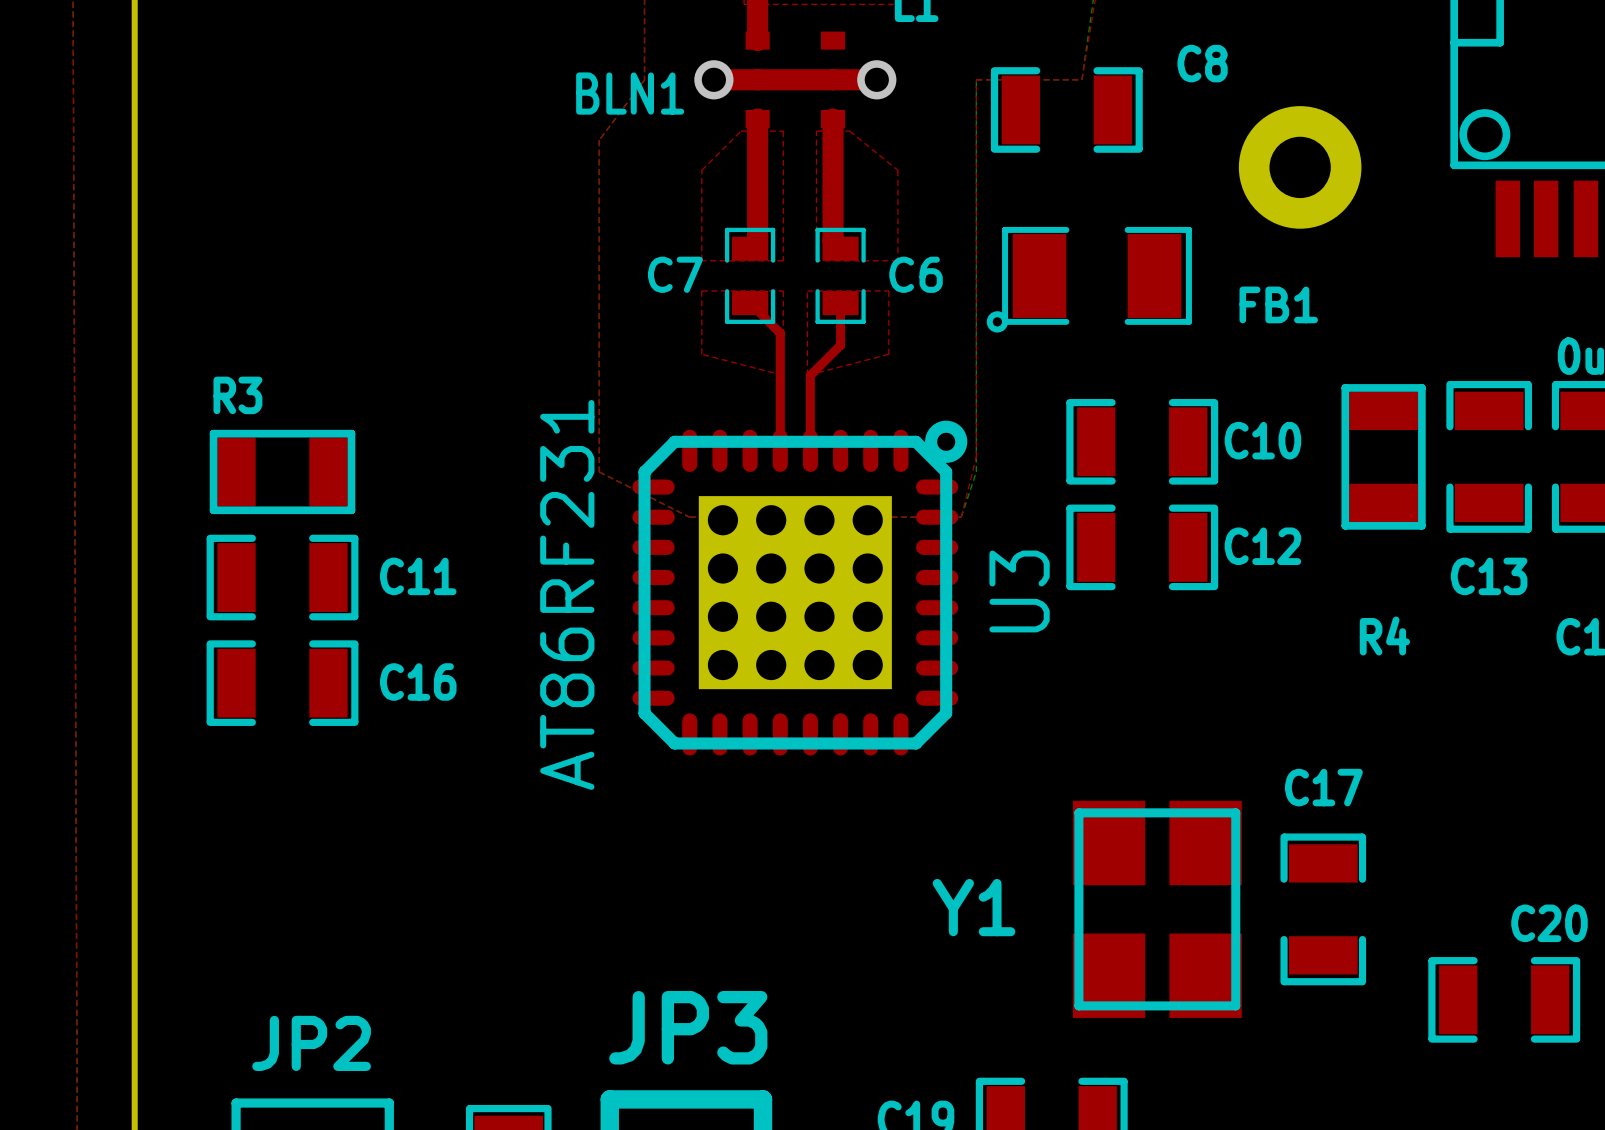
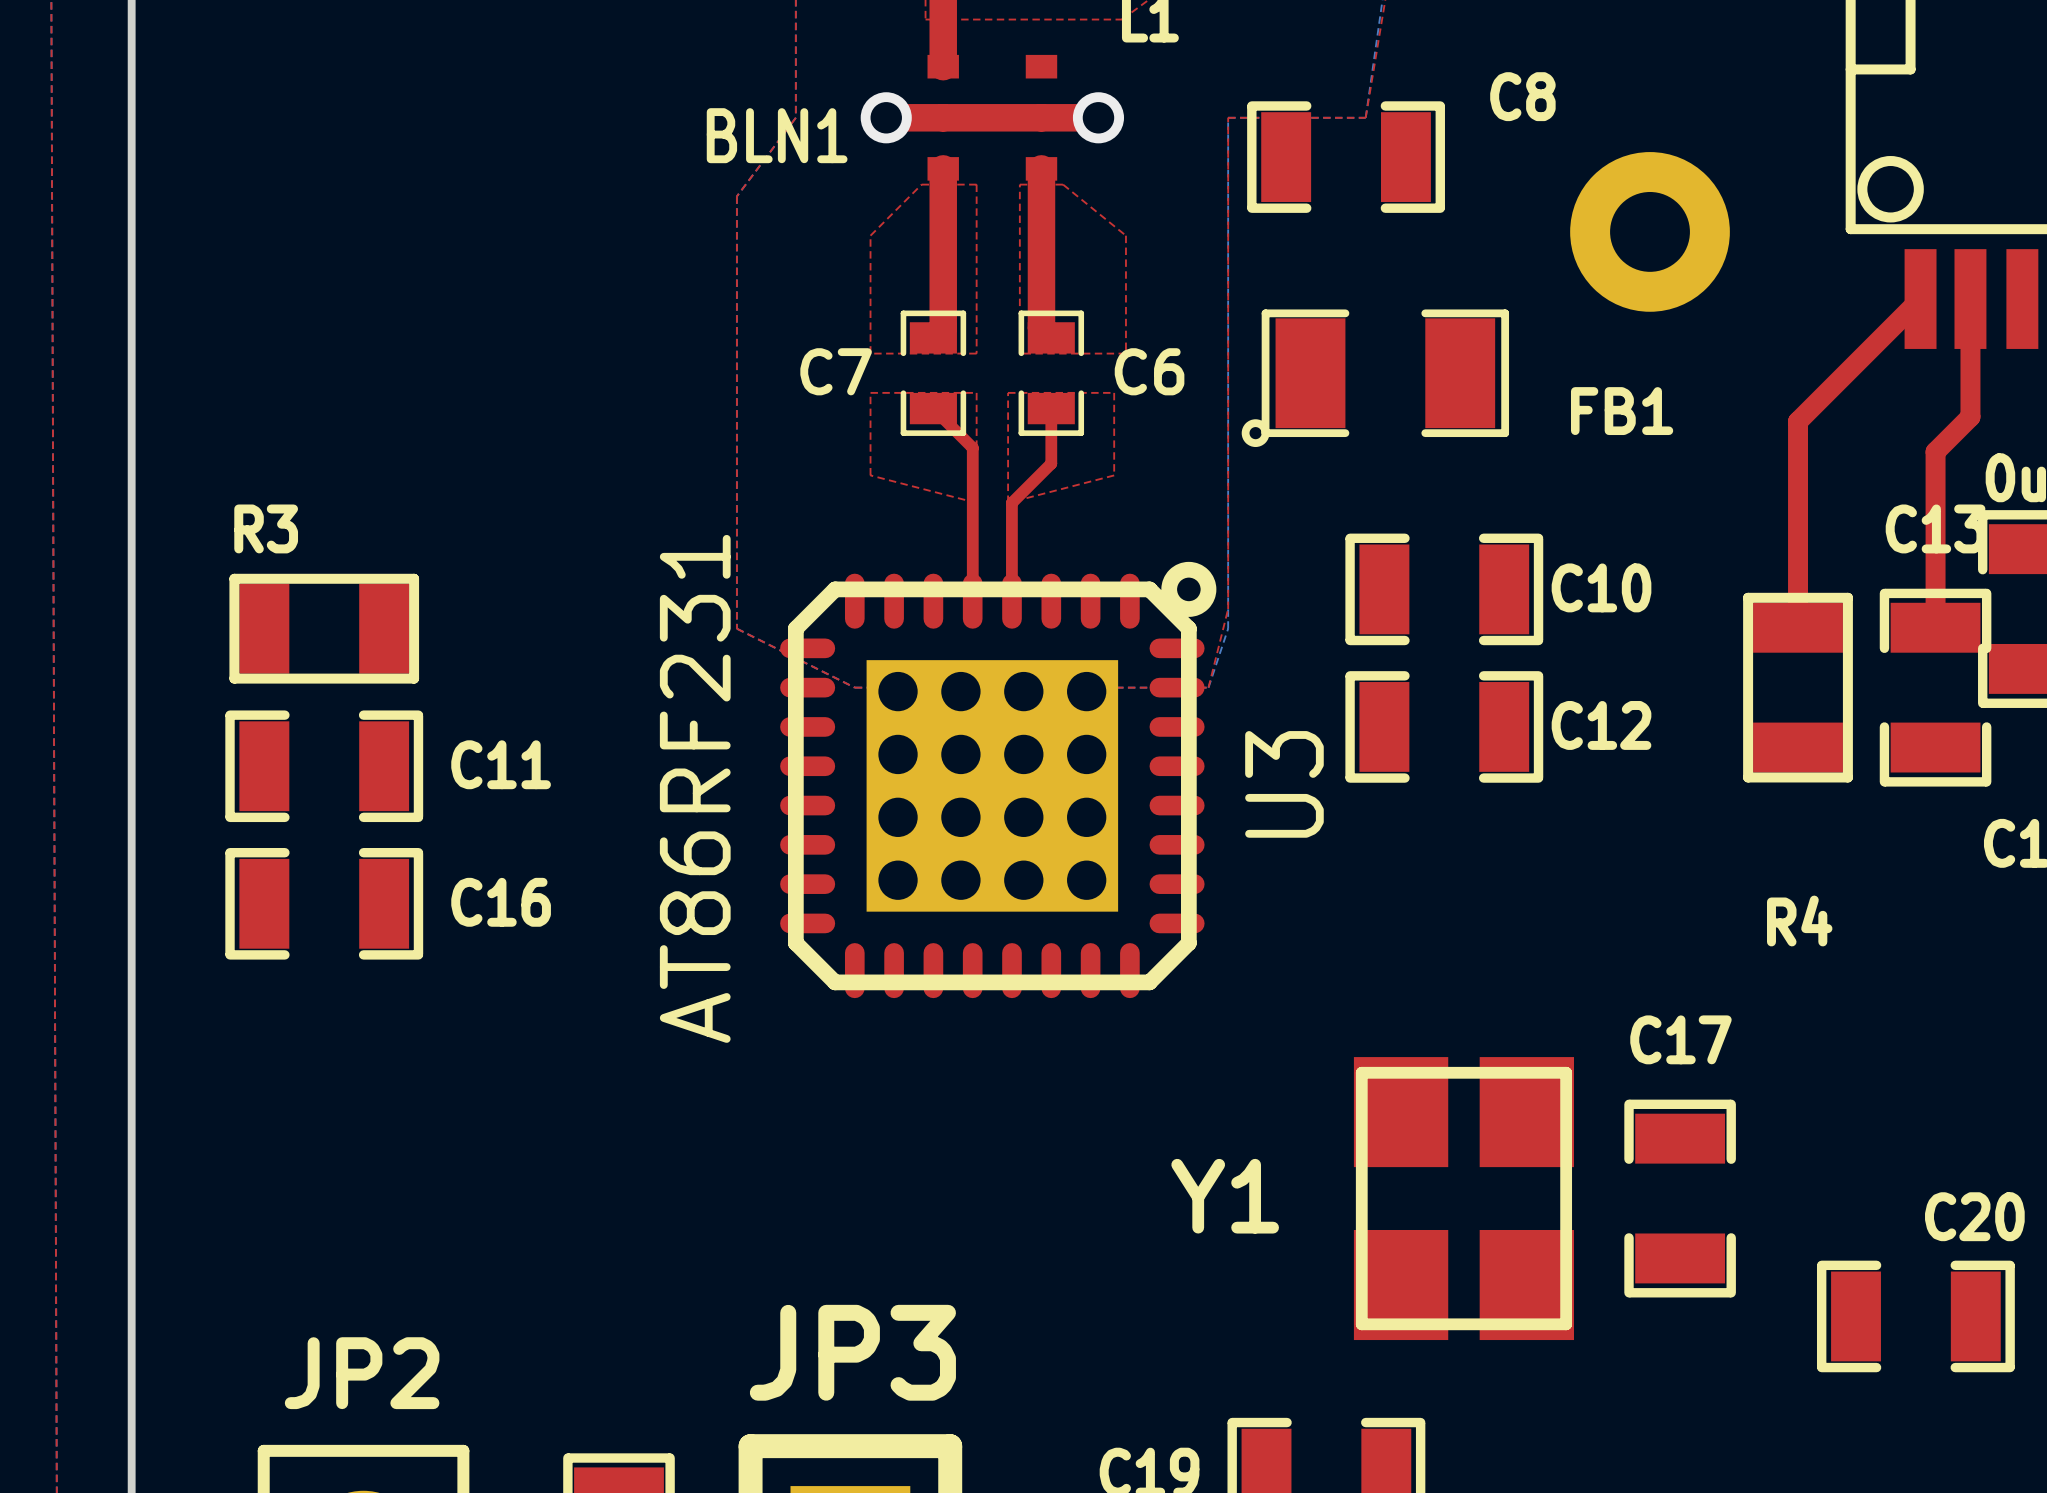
top track: none -> (1920, 299) (1798, 421) (1798, 627)
top track: none -> (1970, 299) (1970, 416) (1935, 451) (1935, 627)
R4 position: (1383, 456) -> (1798, 687)
C13 position: (1489, 456) -> (1935, 687)
C13 name position: C13 (1489, 576) -> C13 (1935, 528)

